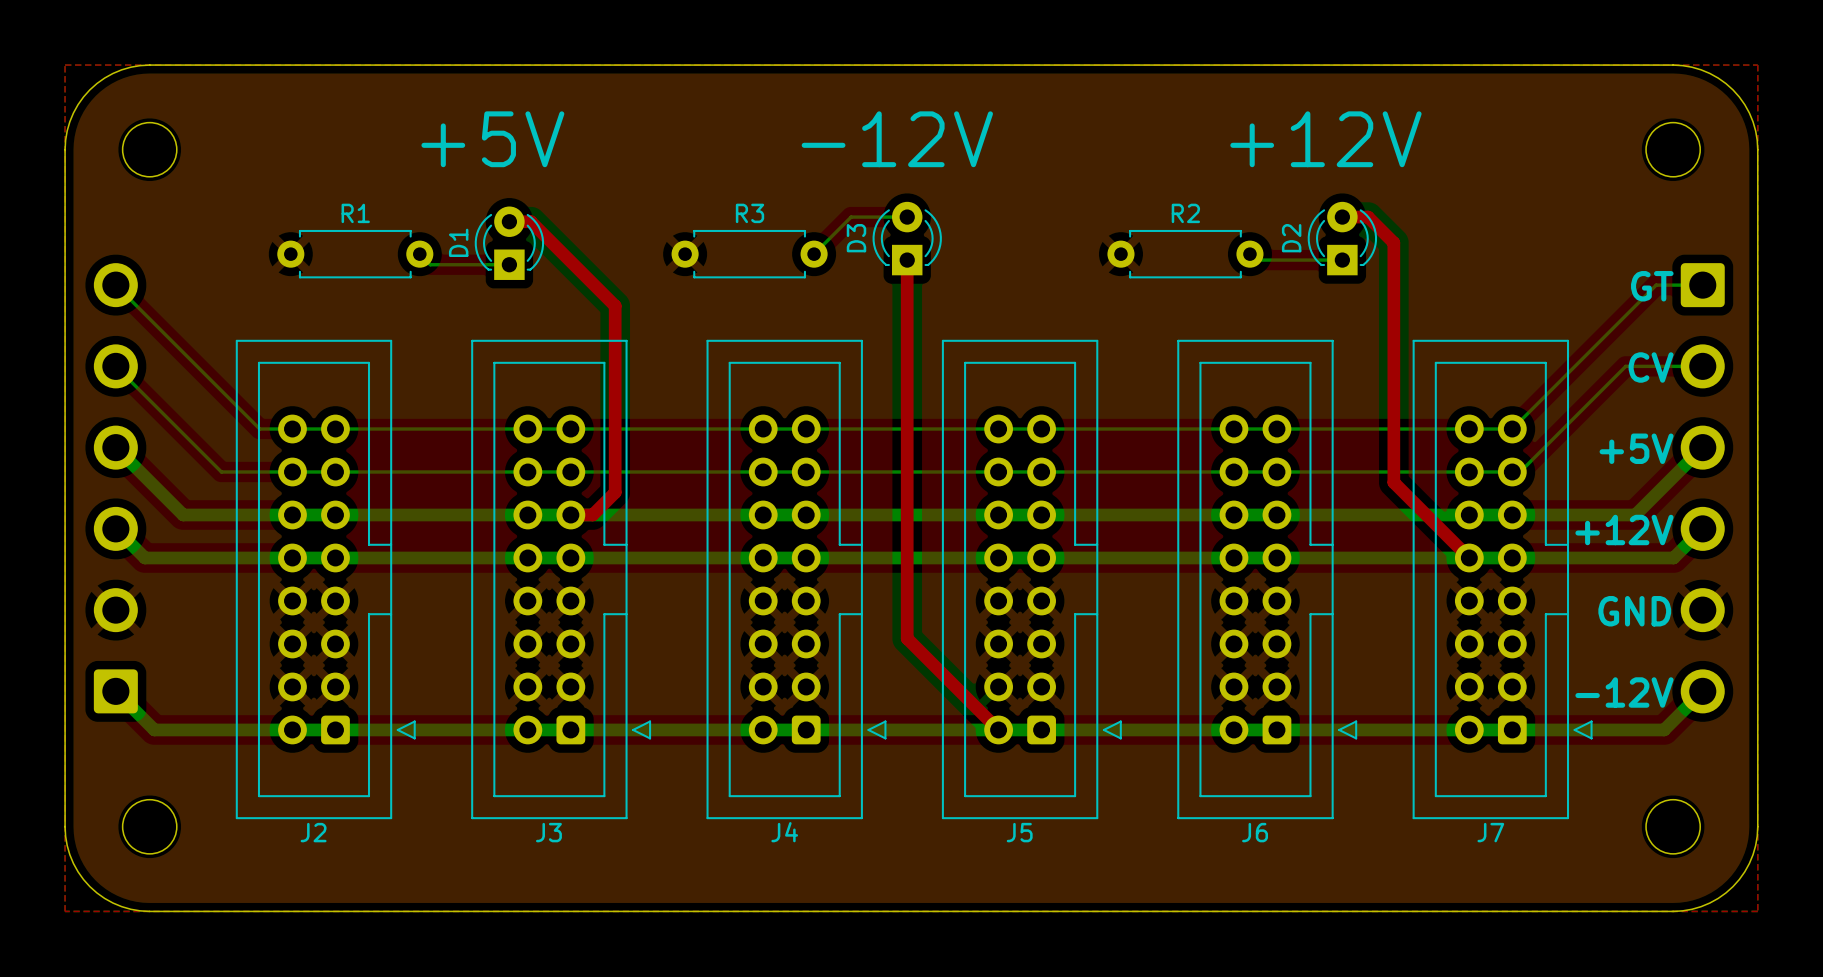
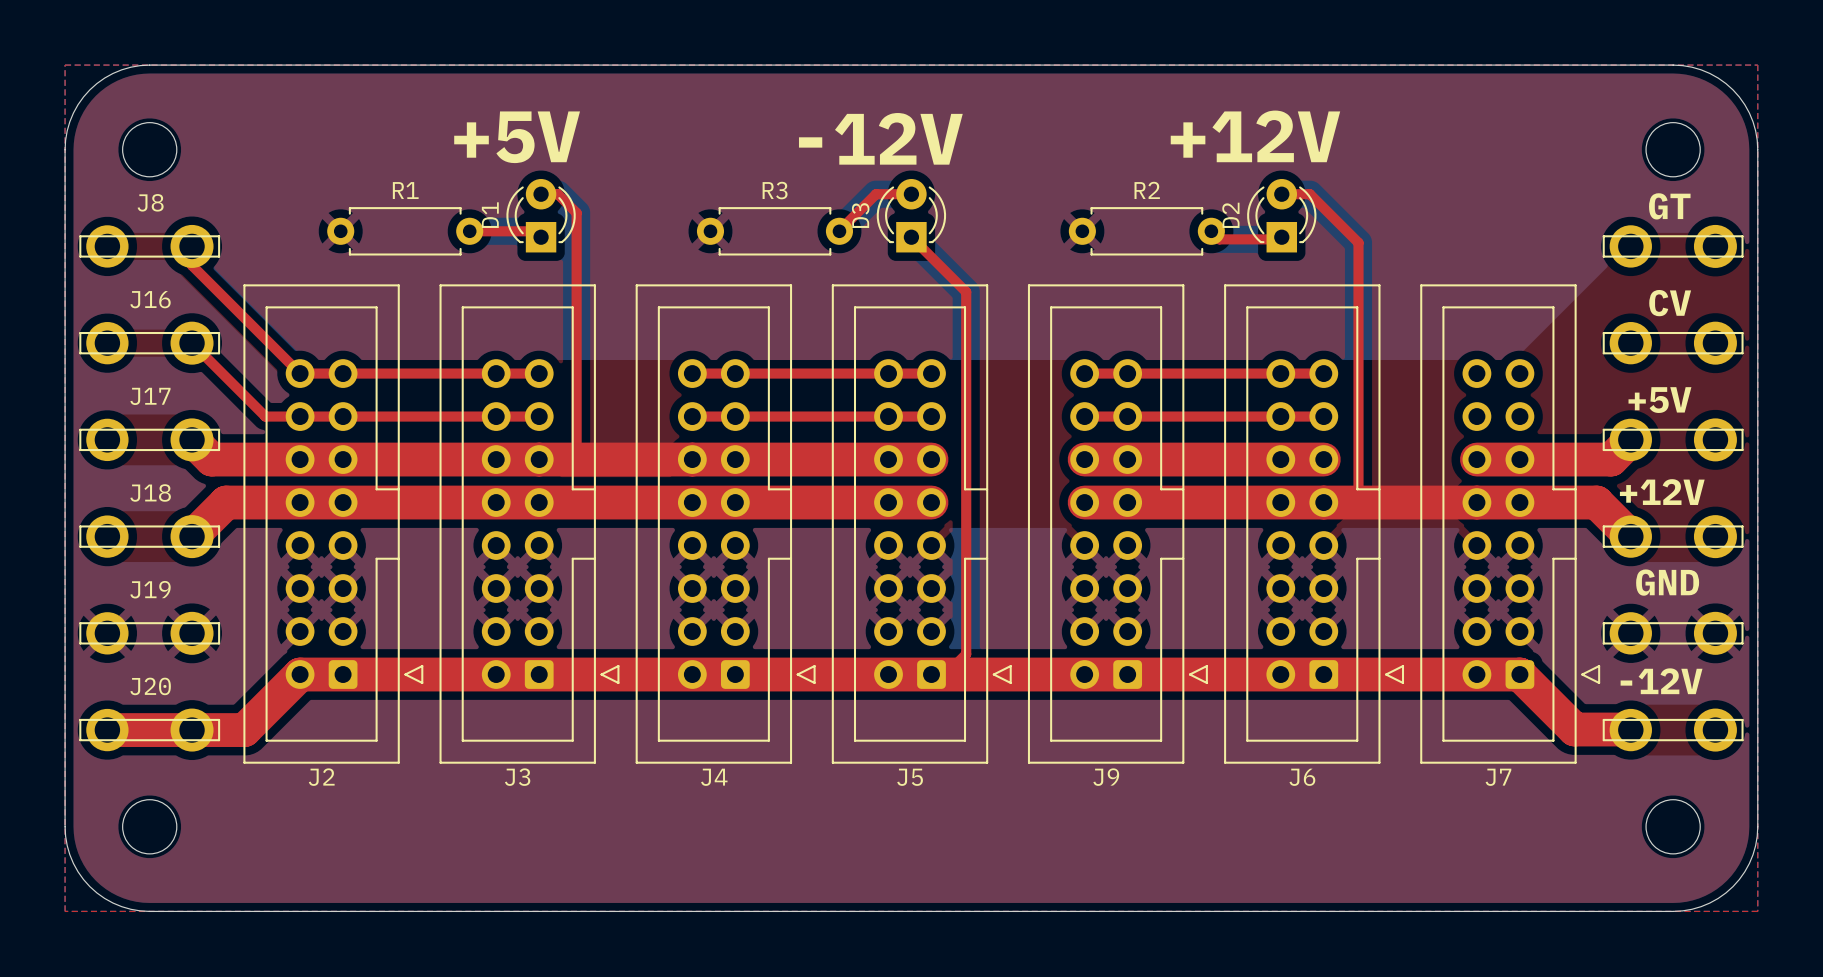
text position: +5V (492, 139) -> +5V (517, 137)
text position: +12V (1325, 139) -> +12V (1255, 136)
top track: none -> (541, 194) (557, 194) (576, 213) (576, 442)
top track: none -> (911, 194) (876, 194) (839, 231)
top track: none -> (1281, 194) (1309, 194) (1358, 242) (1358, 488)
bottom track: (907, 217) (851, 217) (814, 254) -> none
top track: (1342, 217) (1368, 217) (1393, 242) (1393, 482) (1469, 557) -> none
top track: (509, 221) (530, 221) (615, 305) (615, 492) (592, 514) (570, 514) -> none
top track: none -> (469, 231) (535, 231) (541, 237)
top track: none -> (1211, 231) (1219, 239) (1279, 239) (1281, 237)
top track: none -> (911, 237) (966, 292) (966, 654) (945, 674) (931, 674)
D3 position: (907, 238) -> (911, 215)
D2 position: (1342, 238) -> (1281, 215)
D1 position: (509, 243) -> (541, 215)
J8: none -> (149, 246)
top track: none -> (192, 246) (192, 265) (300, 373) (539, 373)
part: none -> (1673, 246)
R1 position: (355, 254) -> (405, 231)
bottom track: (419, 254) (430, 264) (509, 264) -> none
R3 position: (749, 254) -> (774, 231)
R2 position: (1185, 254) -> (1146, 231)
bottom track: (1249, 254) (1255, 260) (1342, 260) -> none
top track: (907, 260) (907, 638) (998, 729) -> none
bottom track: (115, 285) (259, 429) (1512, 429) (1656, 285) (1702, 285) -> none
text position: GT (1652, 286) -> GT (1669, 206)
J16: none -> (149, 343)
top track: none -> (192, 343) (265, 416) (539, 416)
part: none -> (1673, 343)
bottom track: (115, 366) (221, 472) (1520, 472) (1625, 366) (1702, 366) -> none
text position: CV (1651, 367) -> CV (1670, 303)
top track: none -> (692, 373) (931, 373)
top track: none -> (1084, 373) (1323, 373)
top track: none -> (692, 416) (931, 416)
top track: none -> (1084, 416) (1323, 416)
J17: none -> (149, 439)
top track: none -> (192, 439) (211, 459) (931, 459)
top track: none -> (1630, 439) (1611, 459) (1476, 459)
part: none -> (1673, 439)
bottom track: (115, 447) (183, 514) (1635, 514) (1702, 447) -> none
text position: +5V (1636, 448) -> +5V (1659, 400)
top track: none -> (1084, 459) (1323, 459)
part: (115, 488) -> none
part: (1702, 488) -> none
top track: none -> (931, 502) (226, 502) (192, 536)
top track: none -> (1084, 502) (1596, 502) (1630, 536)
J9: none -> (1117, 524)
bottom track: (115, 528) (144, 557) (1673, 557) (1702, 528) -> none
text position: +12V (1624, 530) -> +12V (1662, 492)
J18: none -> (149, 536)
part: none -> (1673, 536)
J2 position: (325, 579) -> (333, 524)
J3 position: (561, 579) -> (529, 524)
J4 position: (796, 579) -> (725, 524)
J5 position: (1031, 579) -> (921, 524)
J6 position: (1267, 579) -> (1314, 524)
J7 position: (1502, 579) -> (1510, 524)
text position: GND (1634, 611) -> GND (1667, 582)
J19: none -> (149, 633)
part: none -> (1673, 633)
top track: none -> (1519, 674) (300, 674) (244, 730) (107, 730)
top track: none -> (1519, 674) (1574, 729) (1630, 730)
bottom track: (115, 691) (154, 729) (1664, 729) (1702, 691) -> none
text position: -12V (1624, 692) -> -12V (1661, 681)
J20: none -> (149, 730)
part: none -> (1673, 730)

